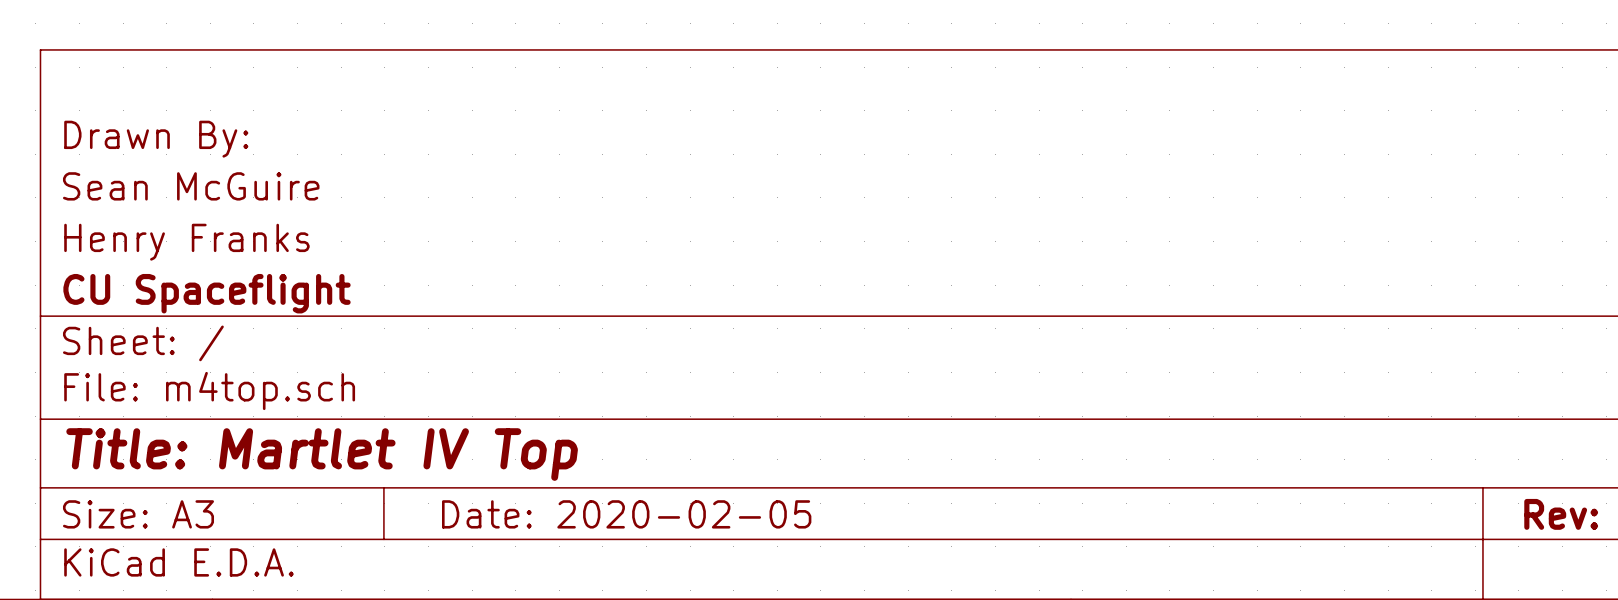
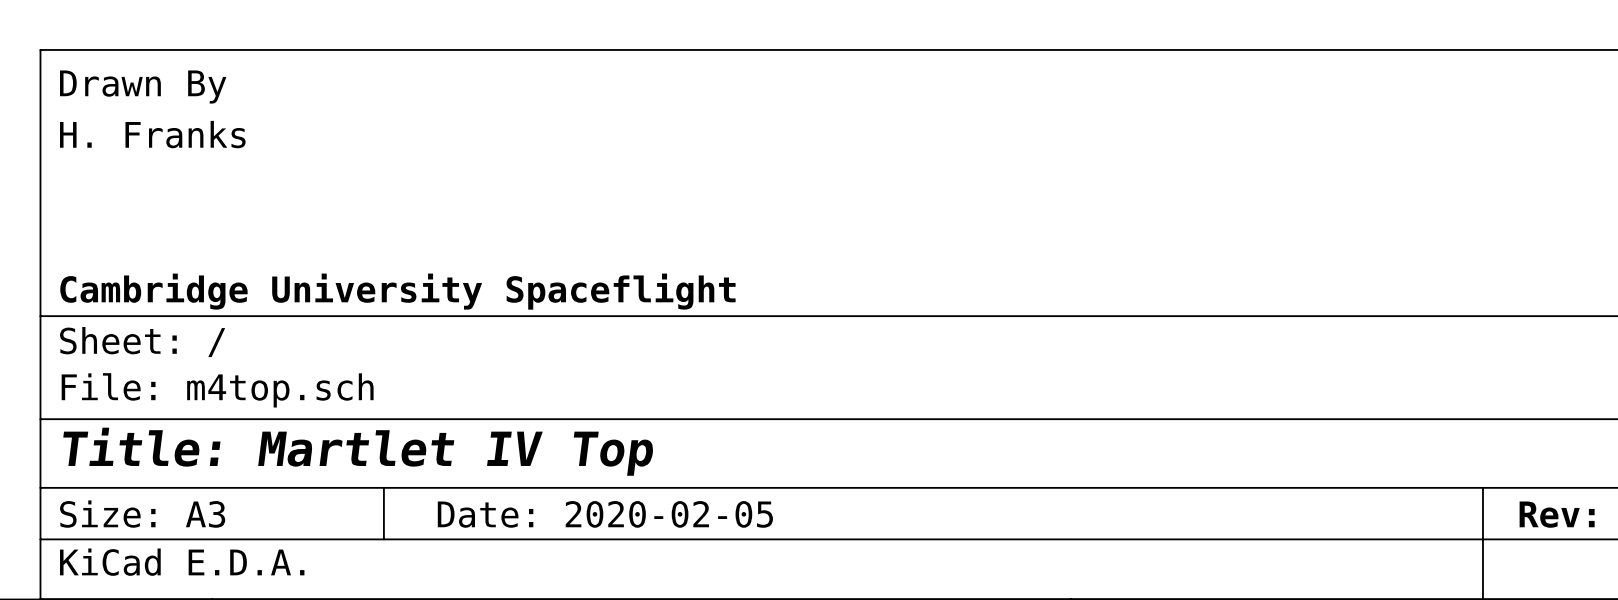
title block: none -> Drawn By (143, 87)
title block: Drawn By: (156, 139) -> H. Franks (152, 134)
title block: Sean McGuire (191, 186) -> none
title block: Henry Franks (186, 242) -> none
title block: CU Spaceflight (207, 293) -> Cambridge University Spaceflight (397, 291)

